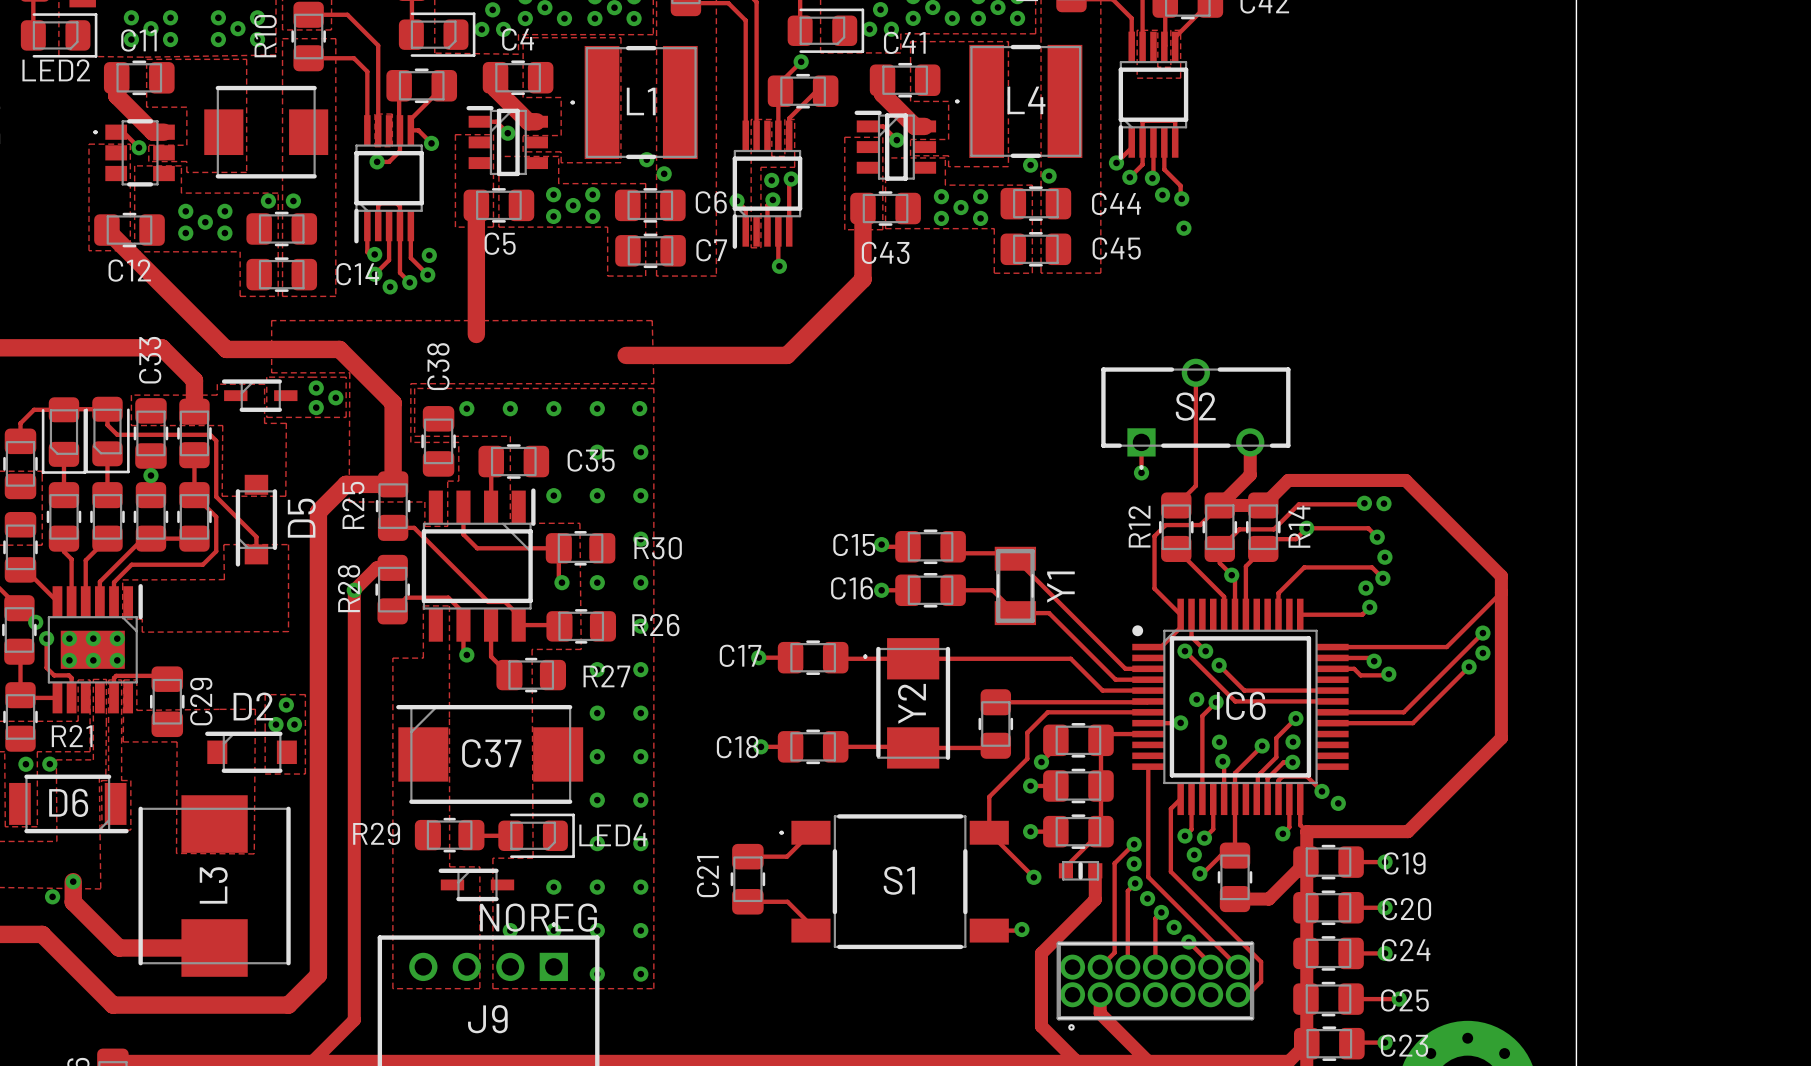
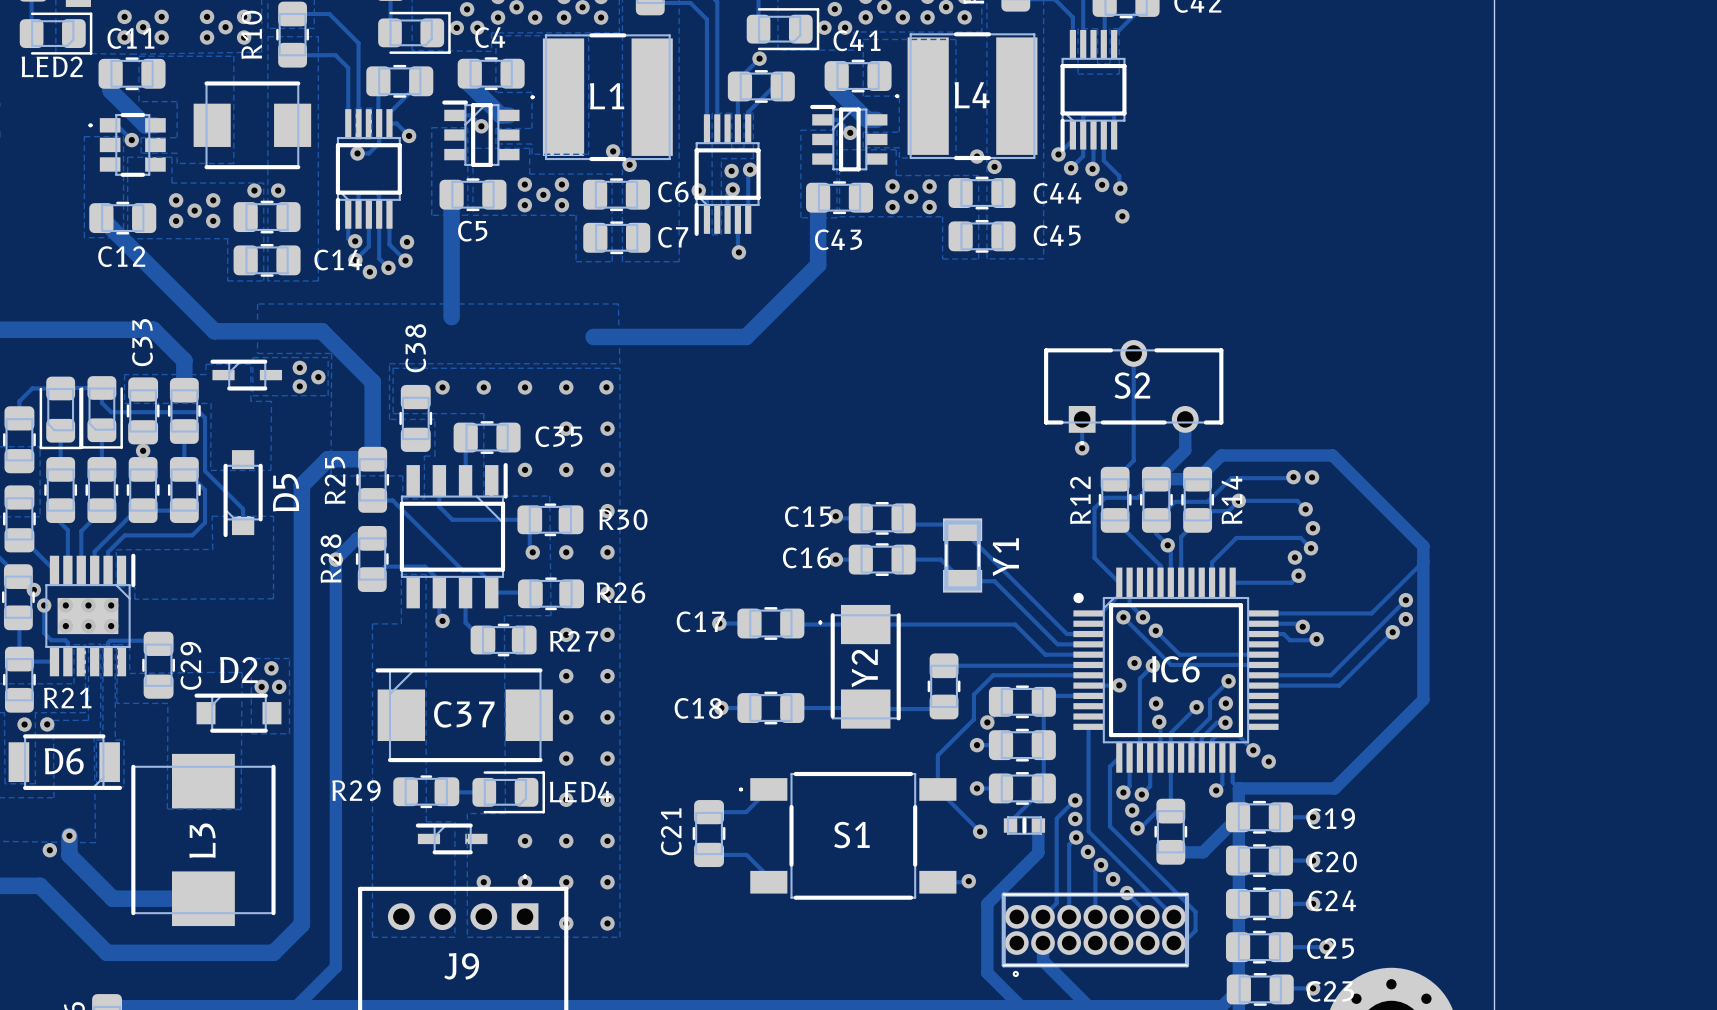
L4 footprint: [955, 44, 1083, 158] -> [895, 32, 1038, 161]
L1 footprint: [570, 45, 698, 160] -> [530, 33, 673, 162]
J9 text: NOREG (538, 917) -> none

